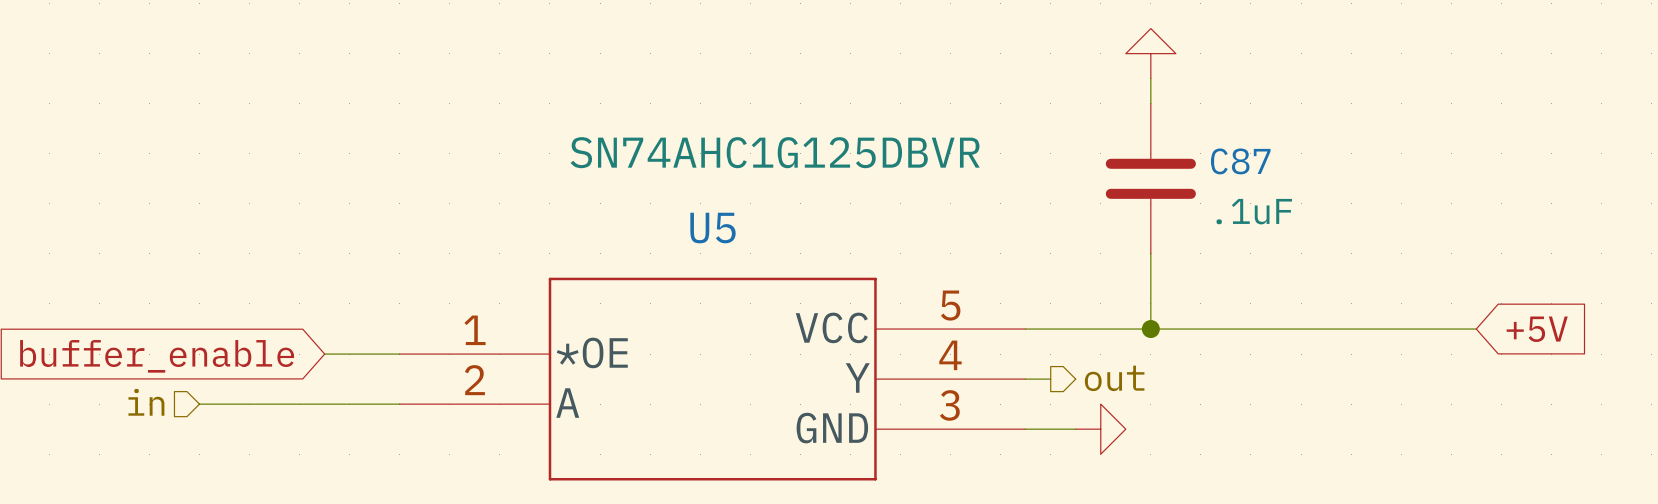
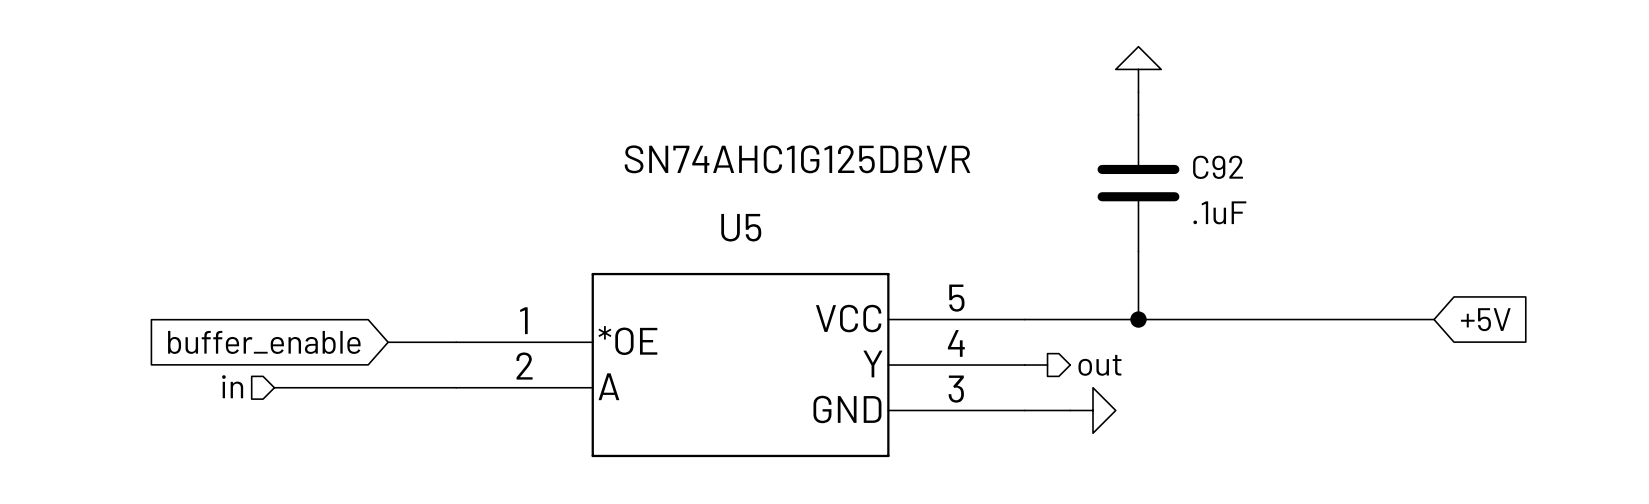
C87 name: C87 (1240, 161) -> C92 (1218, 167)

